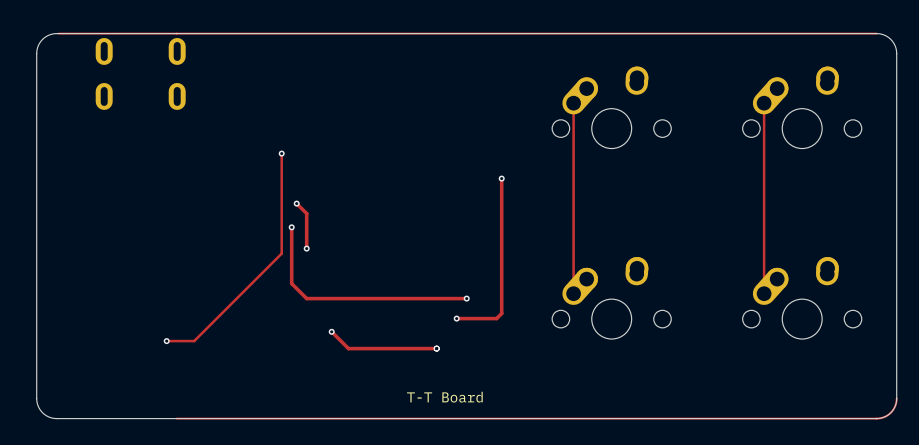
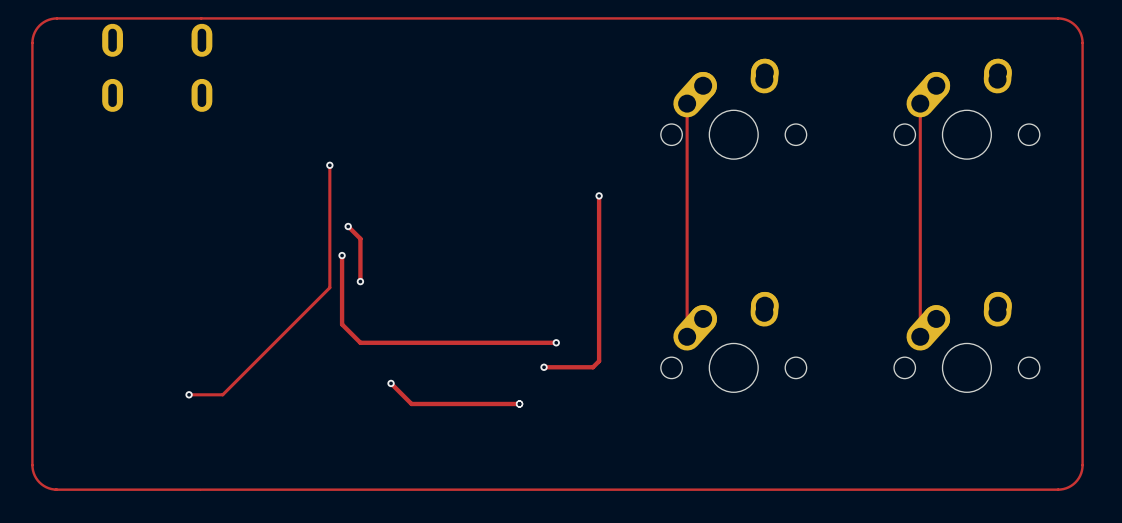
board edge: (56, 33) (876, 33) (885, 35) (893, 42) (896, 53) (896, 398) (894, 407) (887, 415) (876, 418) (56, 418) (48, 416) (39, 409) (36, 398) (36, 53) (42, 39) (56, 33) -> none
track: none -> (56, 18) (46, 20) (39, 25) (33, 34) (32, 42) (32, 465) (34, 475) (39, 482) (46, 487) (56, 489)
track: none -> (1058, 18) (1066, 19) (1075, 25) (1080, 32) (1082, 42) (1082, 465)
text: T-T Board (444, 397) -> none
track: none -> (55, 489) (200, 489)

